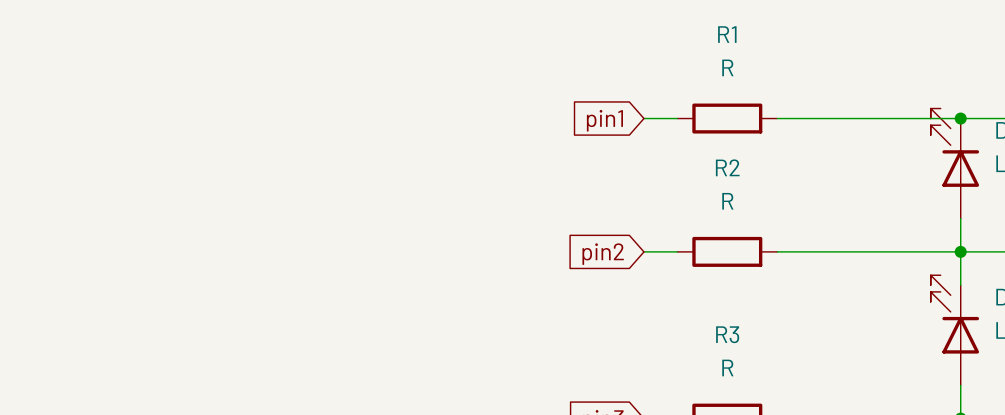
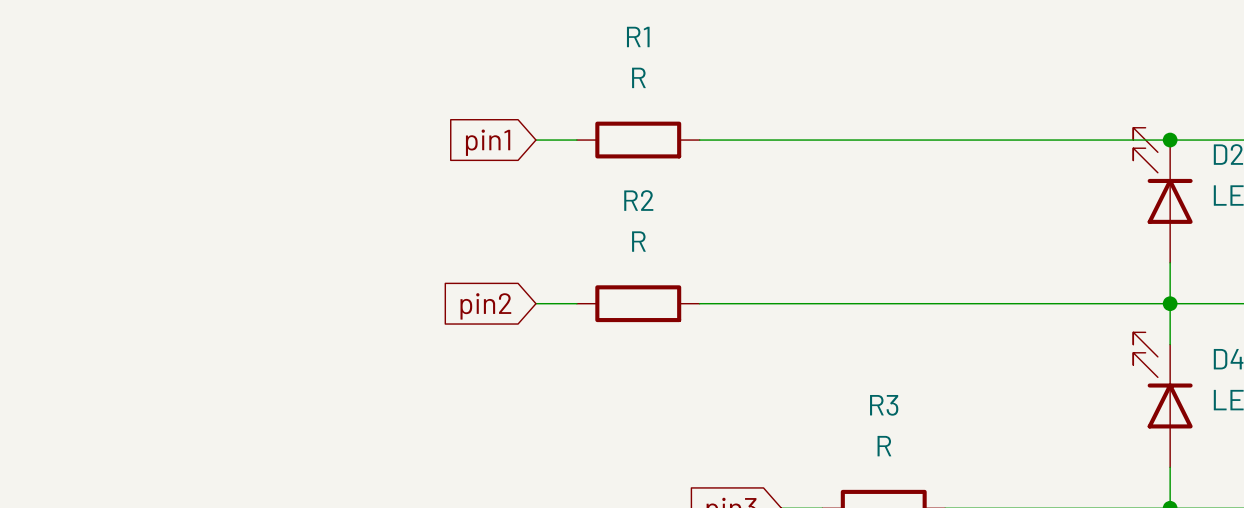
wire: none -> (535, 140) (576, 140)
wire: none -> (699, 140) (781, 140)
wire: none -> (822, 140) (945, 140)
R1 position: (727, 118) -> (638, 140)
global label position: pin1 (604, 120) -> pin1 (488, 142)
wire: none -> (535, 303) (576, 303)
wire: none -> (699, 303) (781, 303)
wire: none -> (822, 303) (945, 303)
R2 position: (727, 251) -> (638, 303)
global label position: pin2 (603, 254) -> pin2 (485, 306)

